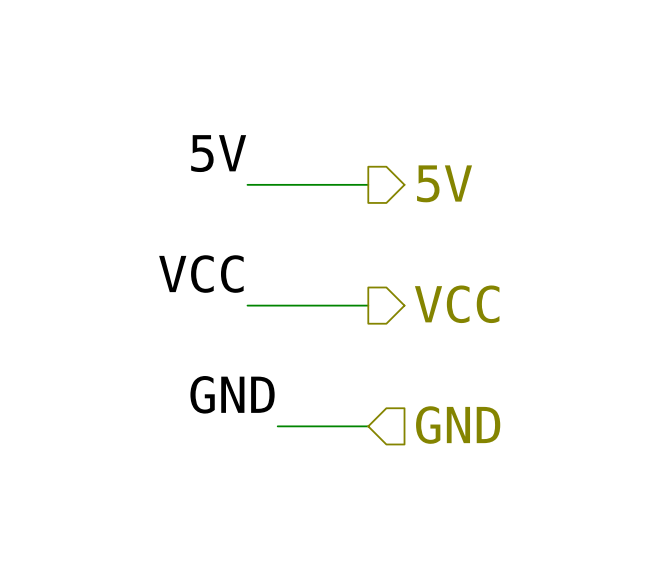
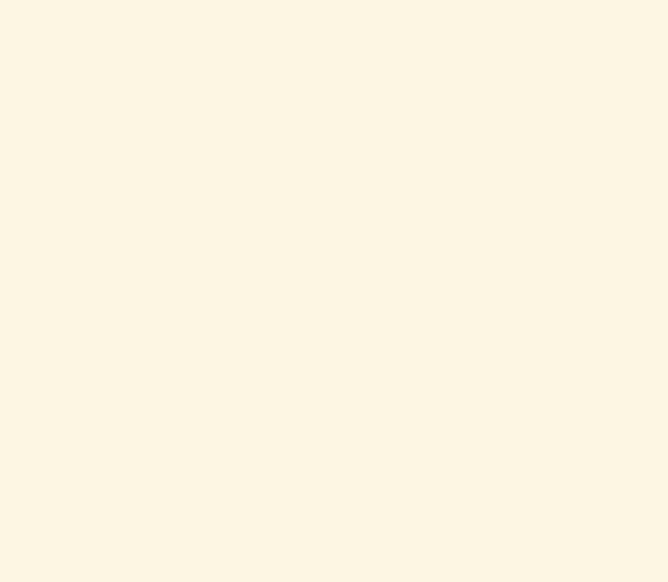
label: 5V (218, 153) -> none
hierarchical label: 5V (444, 183) -> none
wire: (247, 184) (368, 184) -> none
label: VCC (201, 274) -> none
hierarchical label: VCC (457, 304) -> none
wire: (247, 305) (368, 305) -> none
label: GND (232, 394) -> none
hierarchical label: GND (458, 425) -> none
wire: (277, 426) (368, 426) -> none

